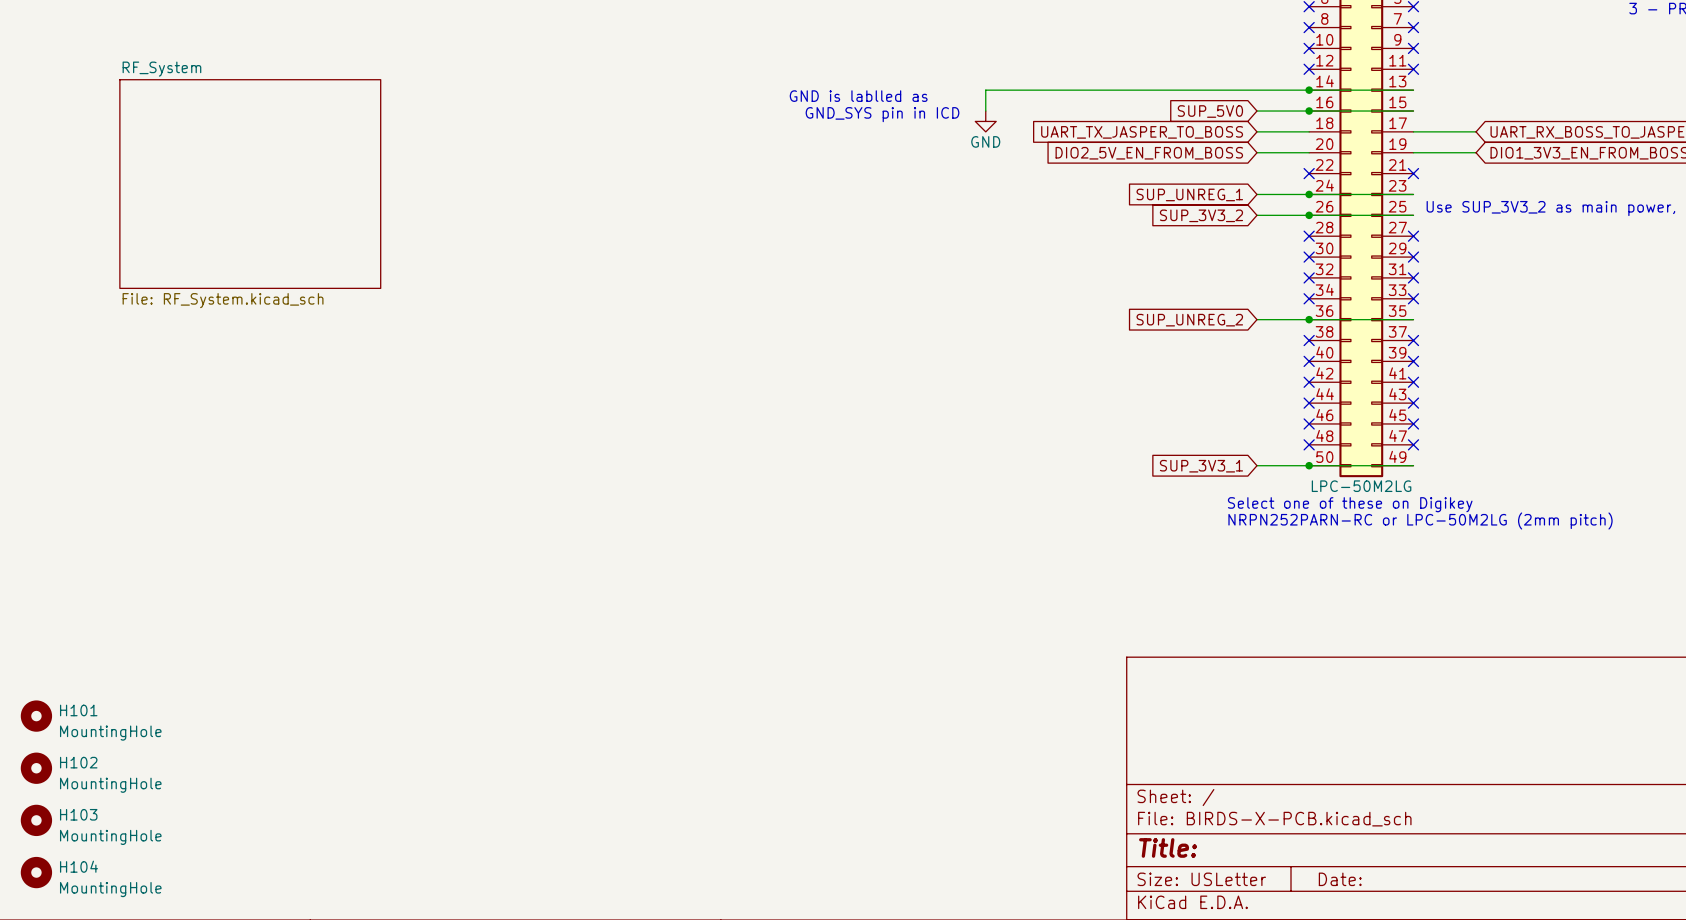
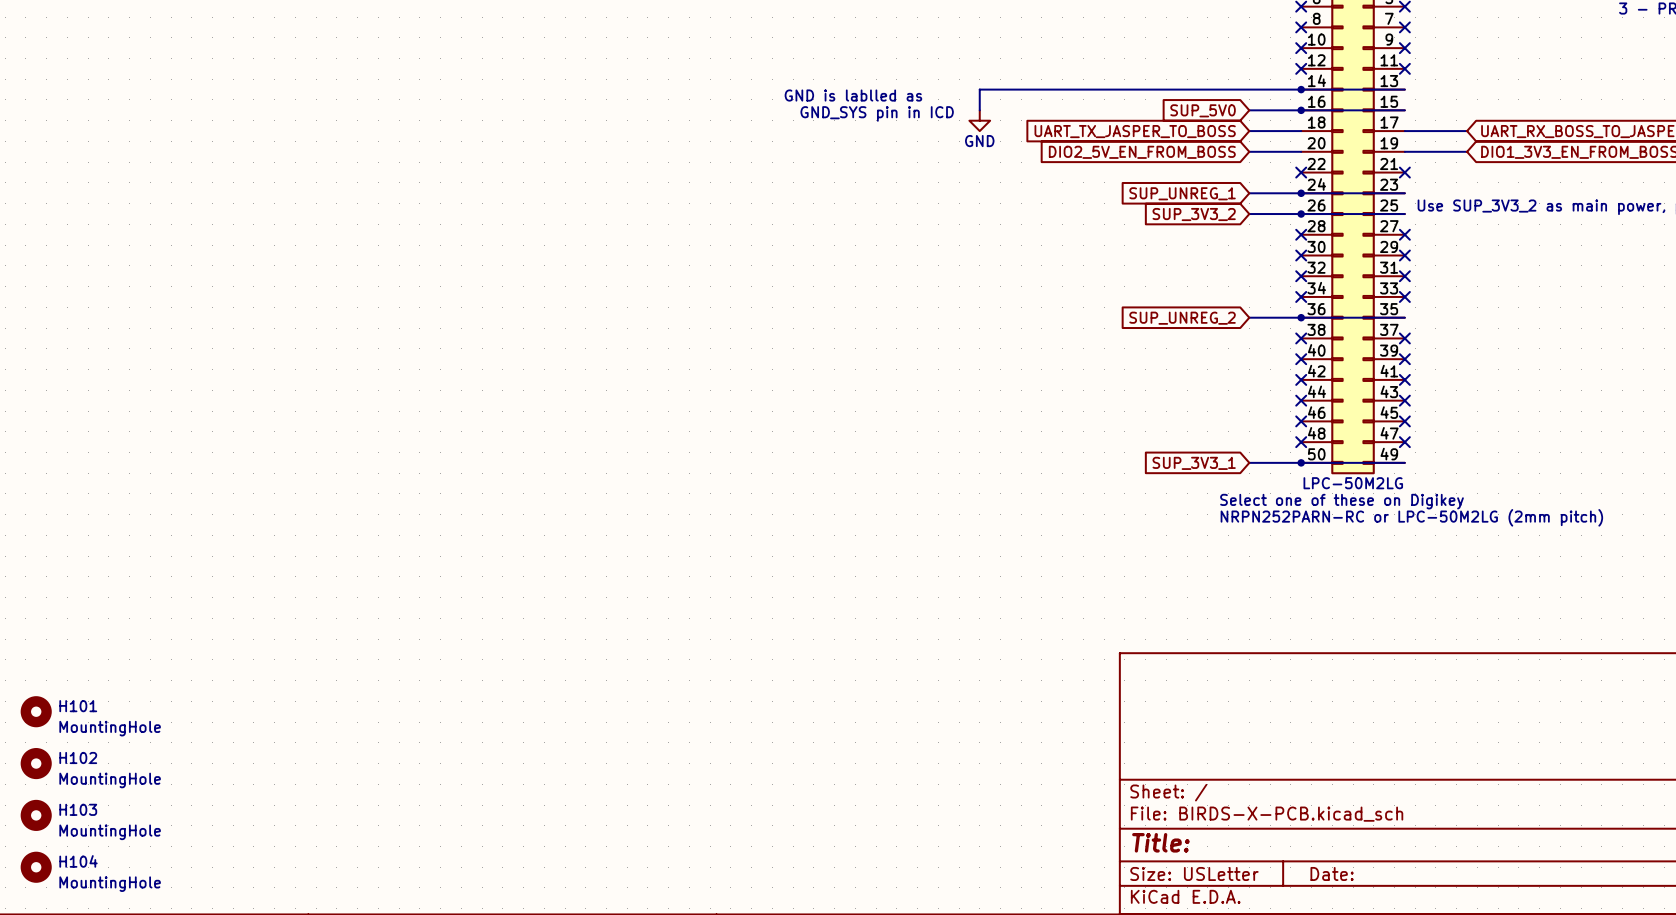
sheet RF_System: File: RF_System.kicad_sch (250, 184) -> none

